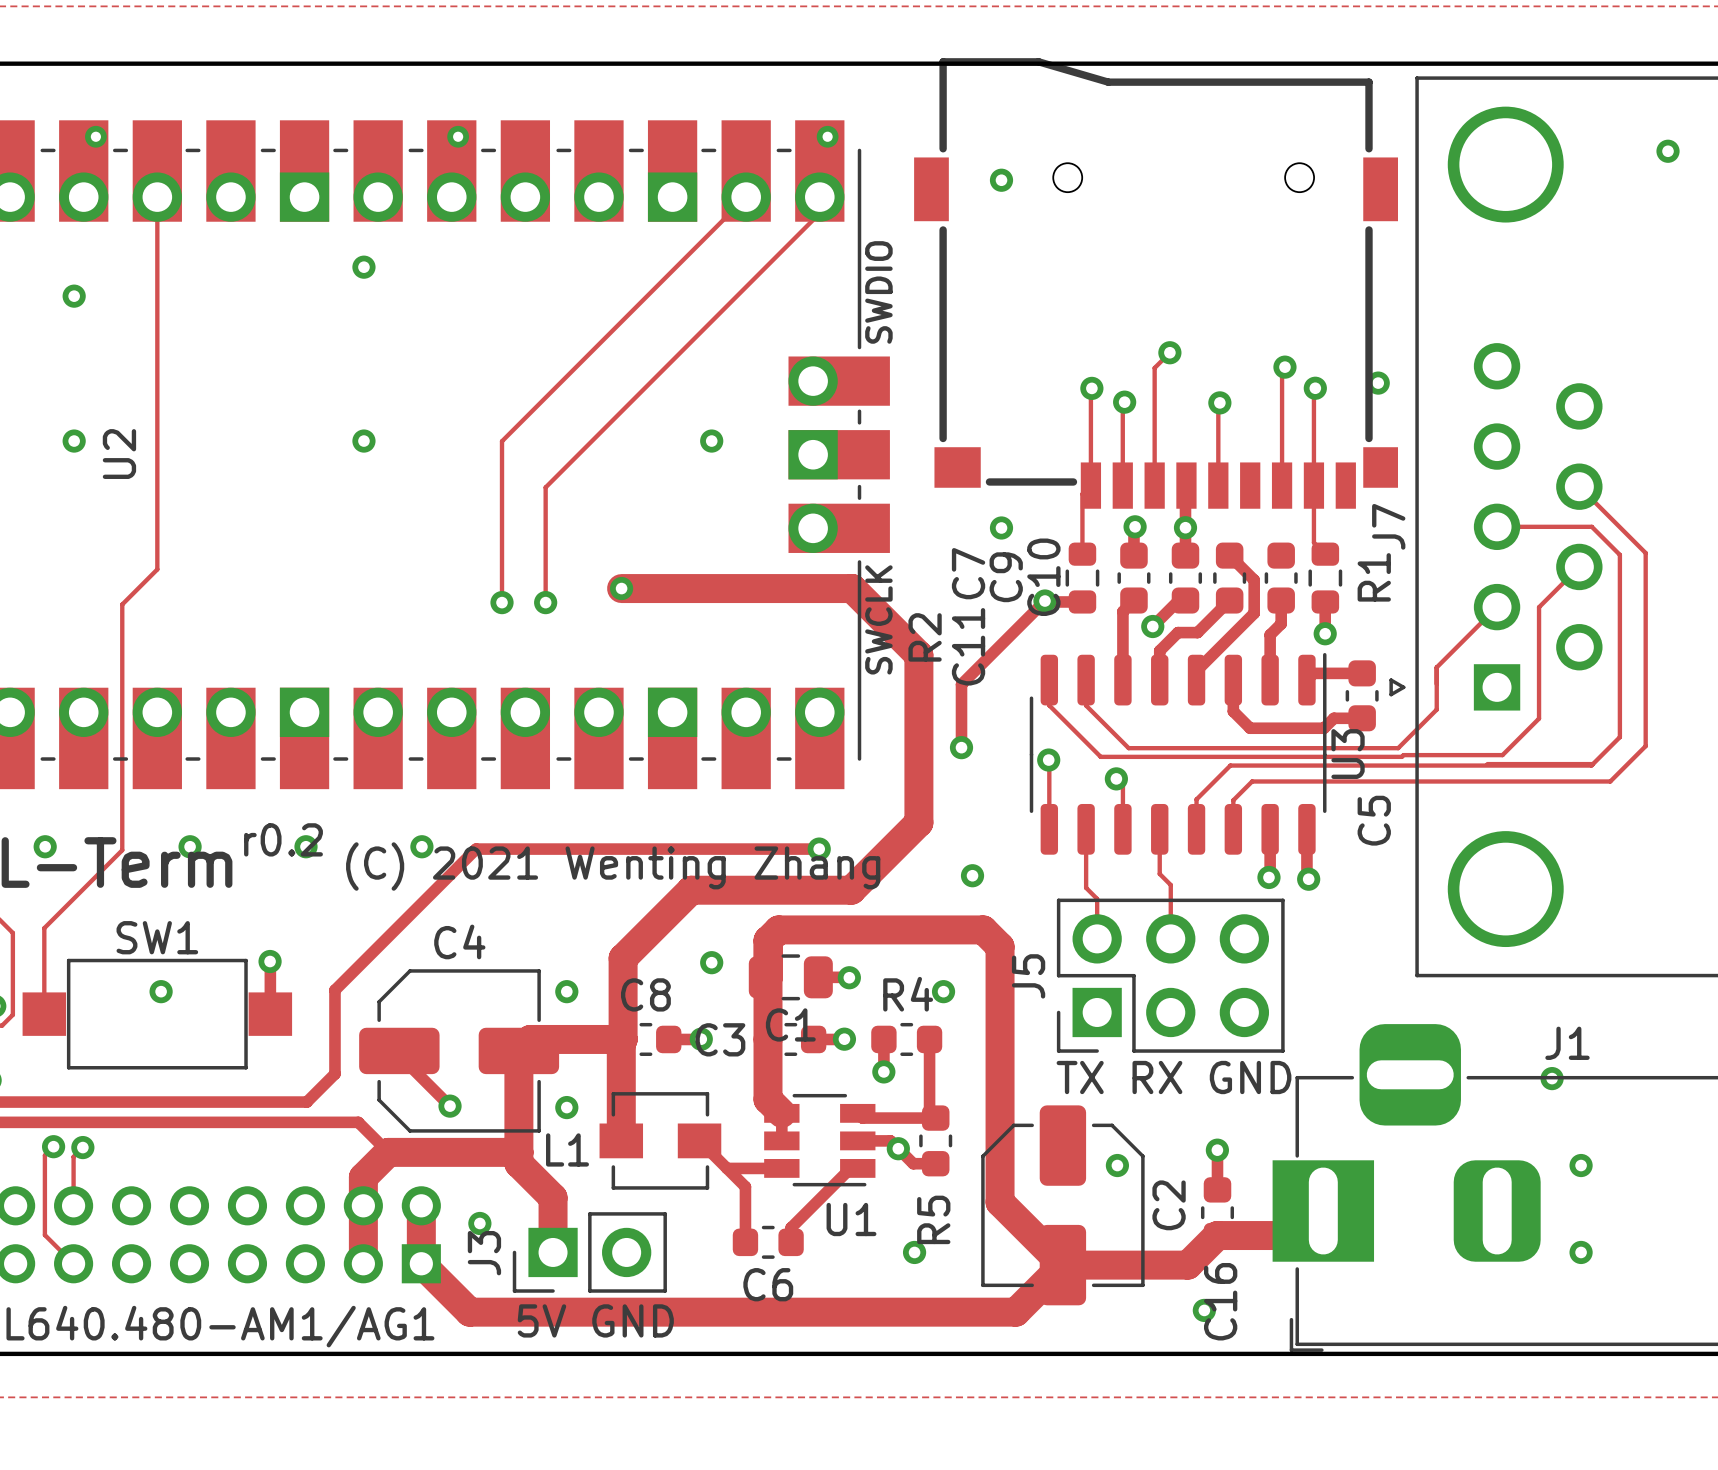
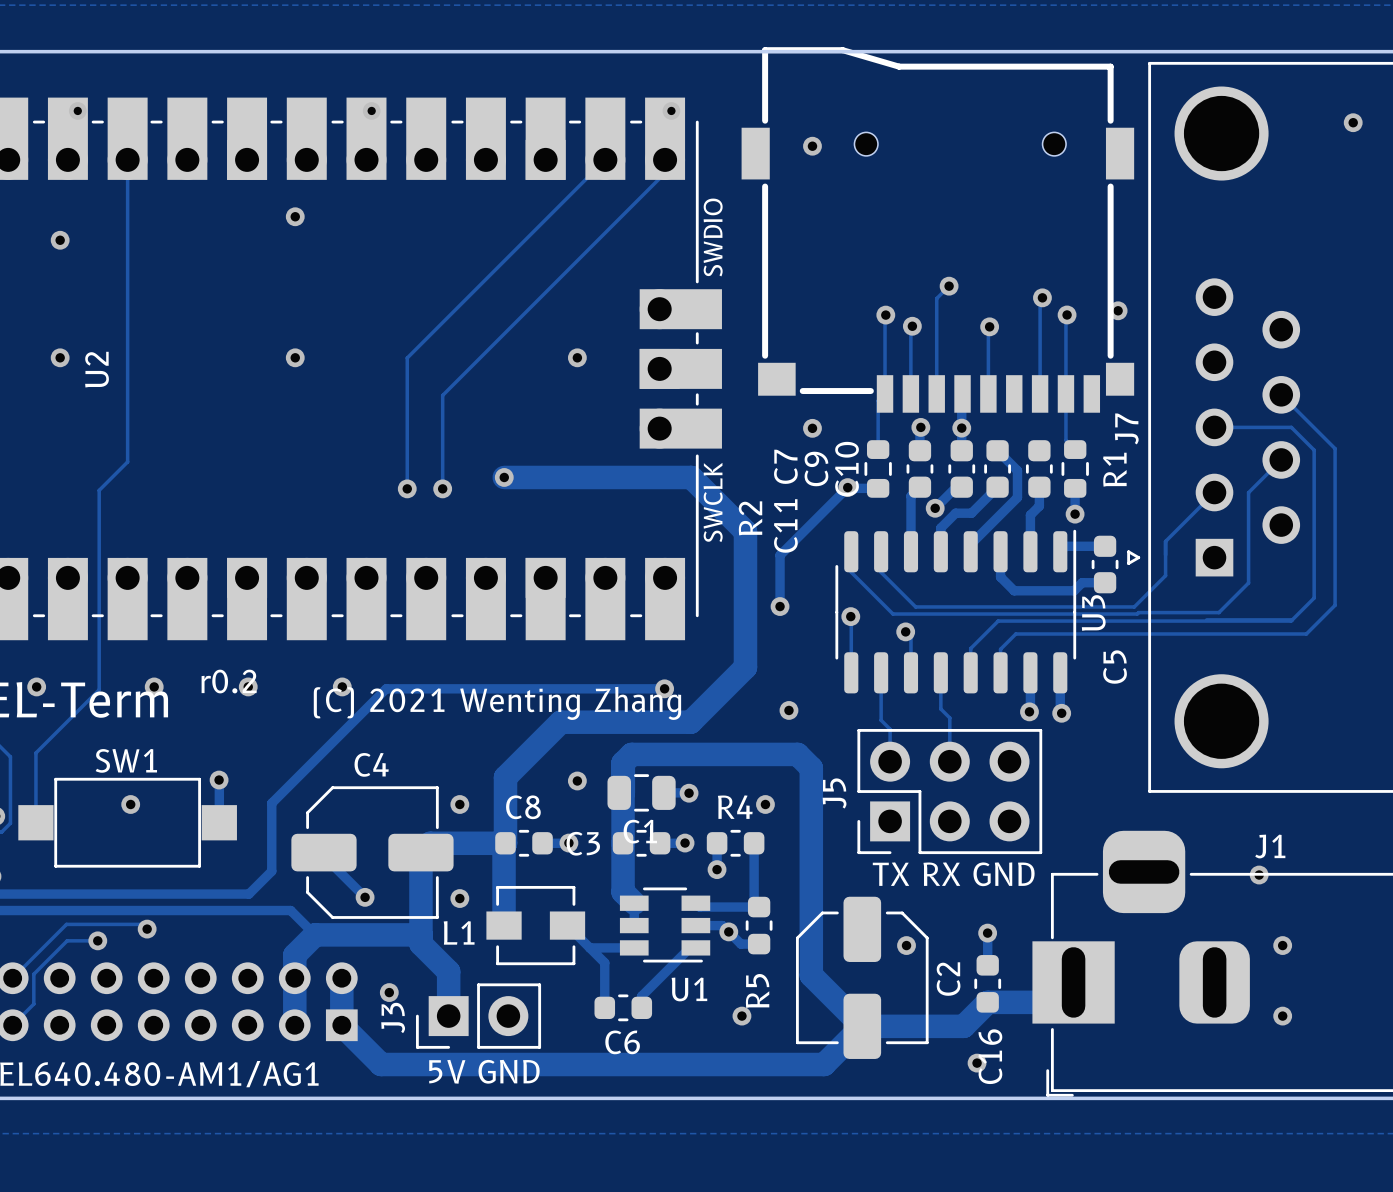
track: none -> (147, 929) (142, 924) (66, 924) (12, 978)
via: none -> (147, 929)
track: (53, 1146) (44, 1155) (44, 1235) (73, 1263) -> none
via: (53, 1146) -> none
track: (82, 1147) (73, 1156) (73, 1205) -> none
via: (82, 1147) -> none
track: none -> (97, 940) (67, 940) (33, 974) (33, 1004) (12, 1025)
via: none -> (97, 940)

